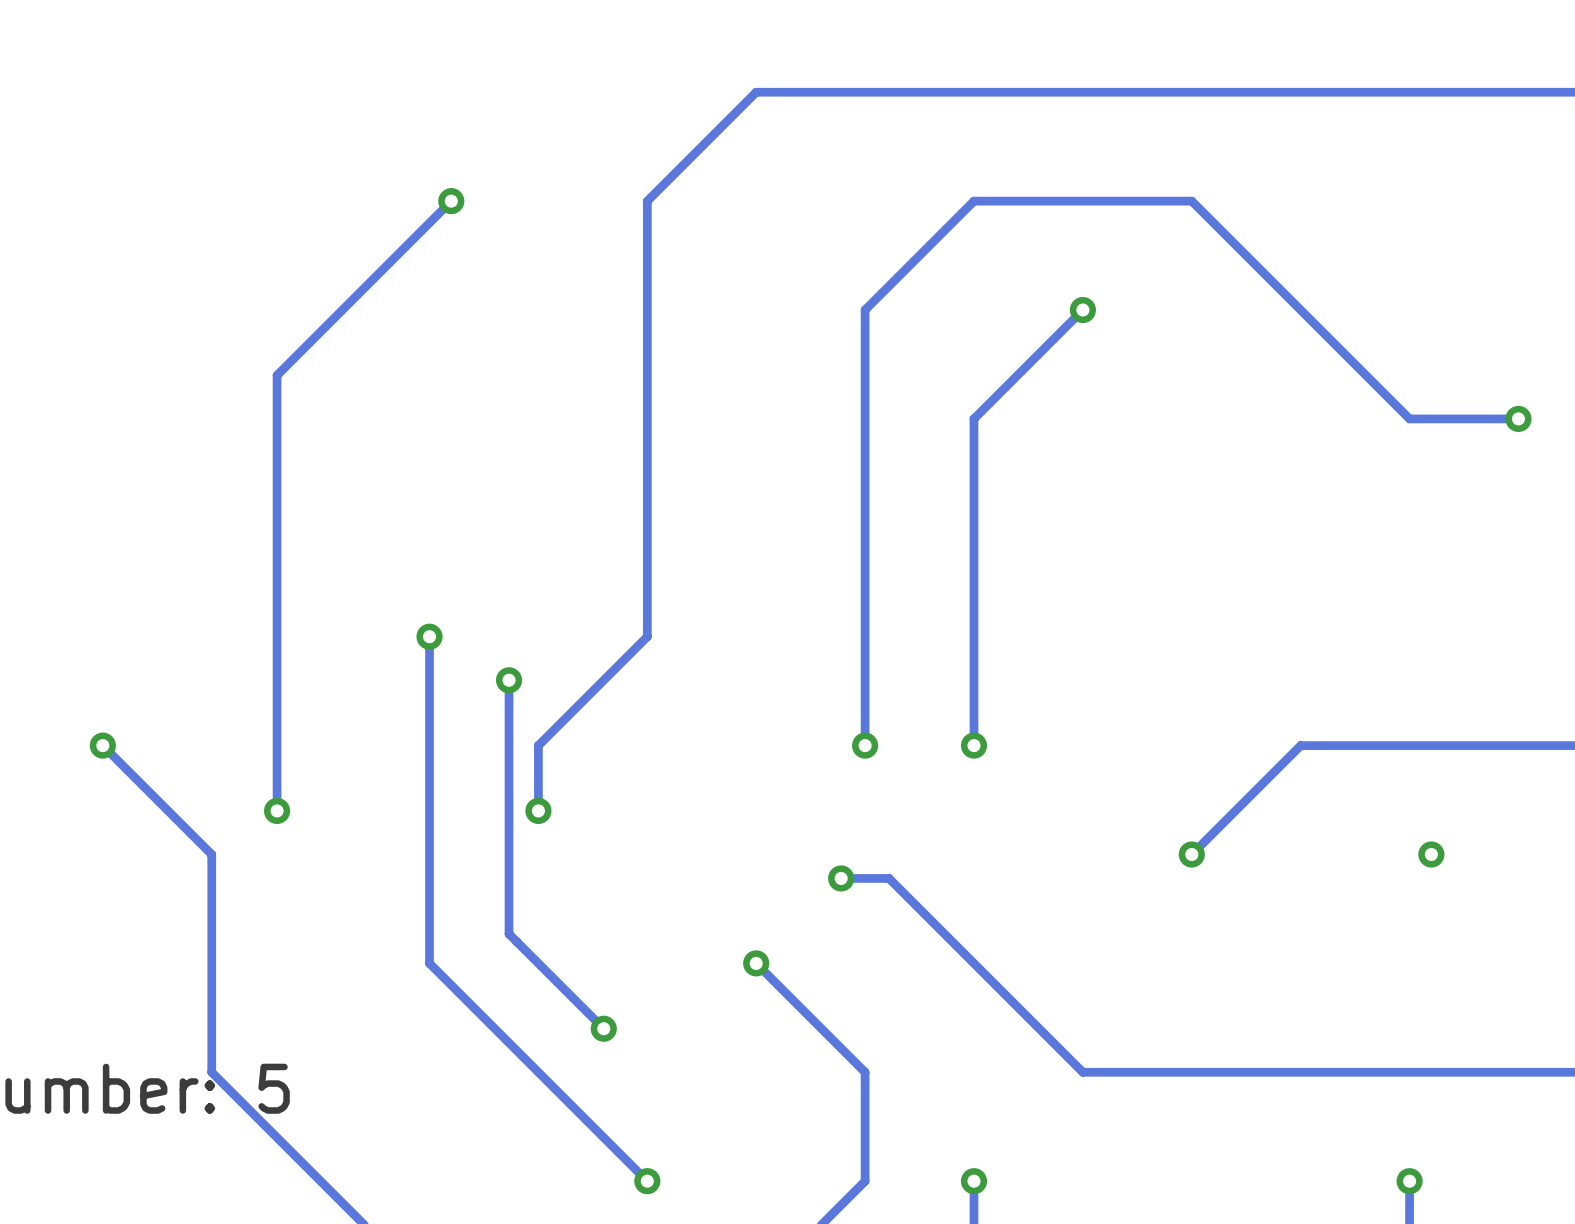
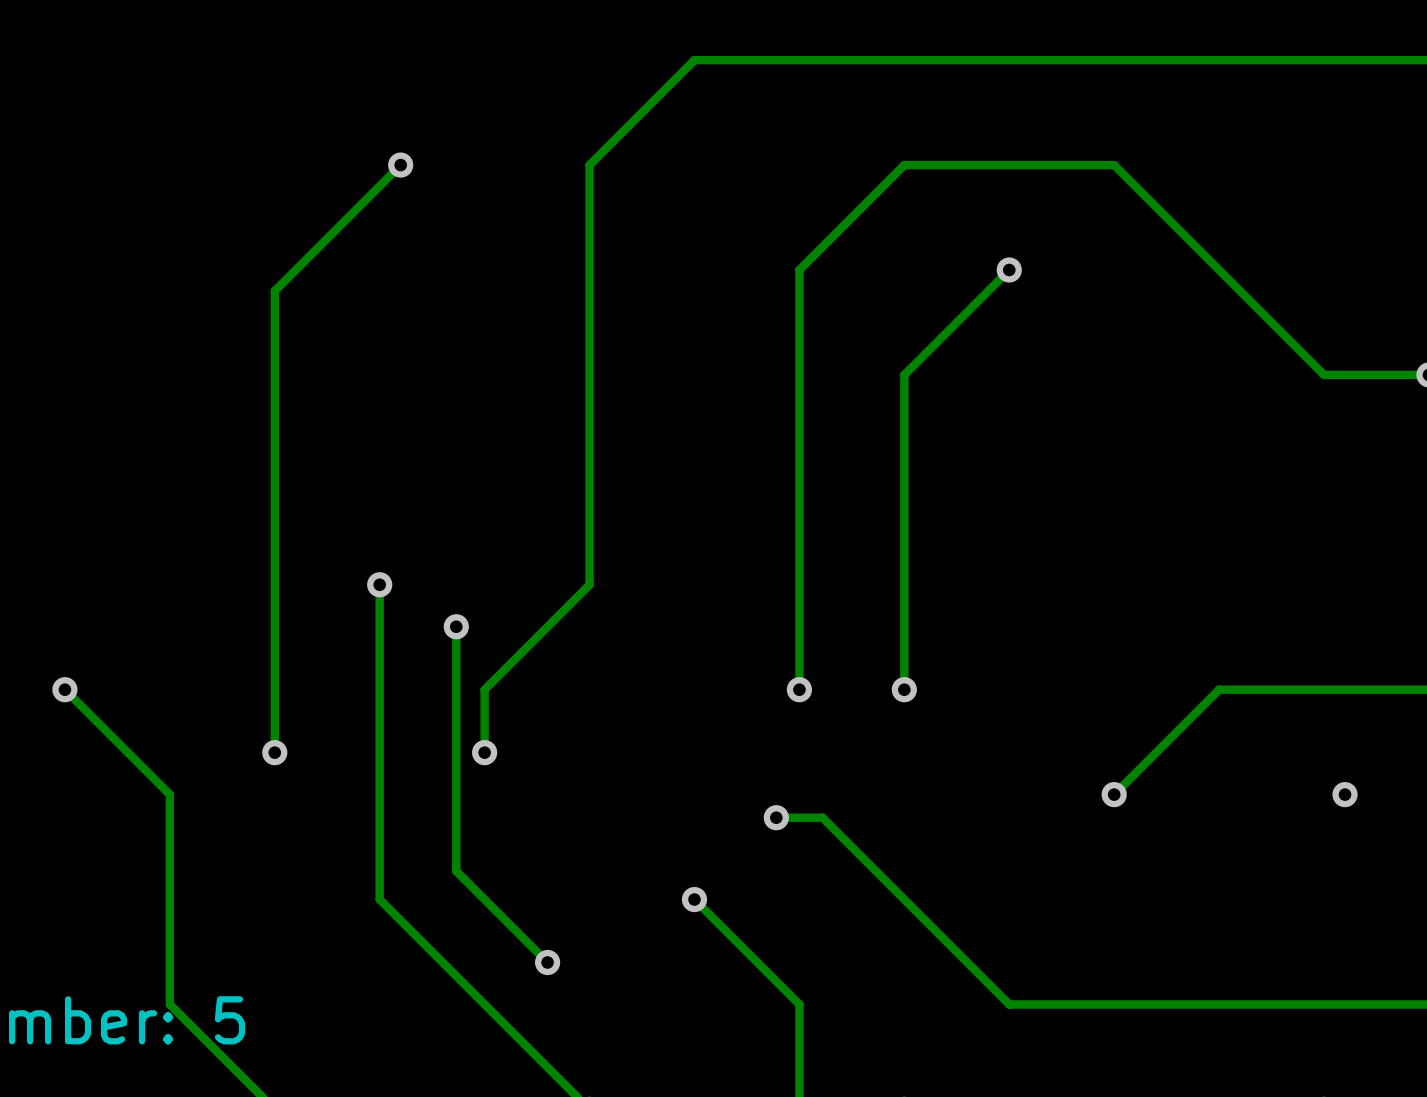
track: (320, 331) (277, 375) (277, 810) -> (274, 290) (274, 752)
via position: (277, 810) -> (274, 752)

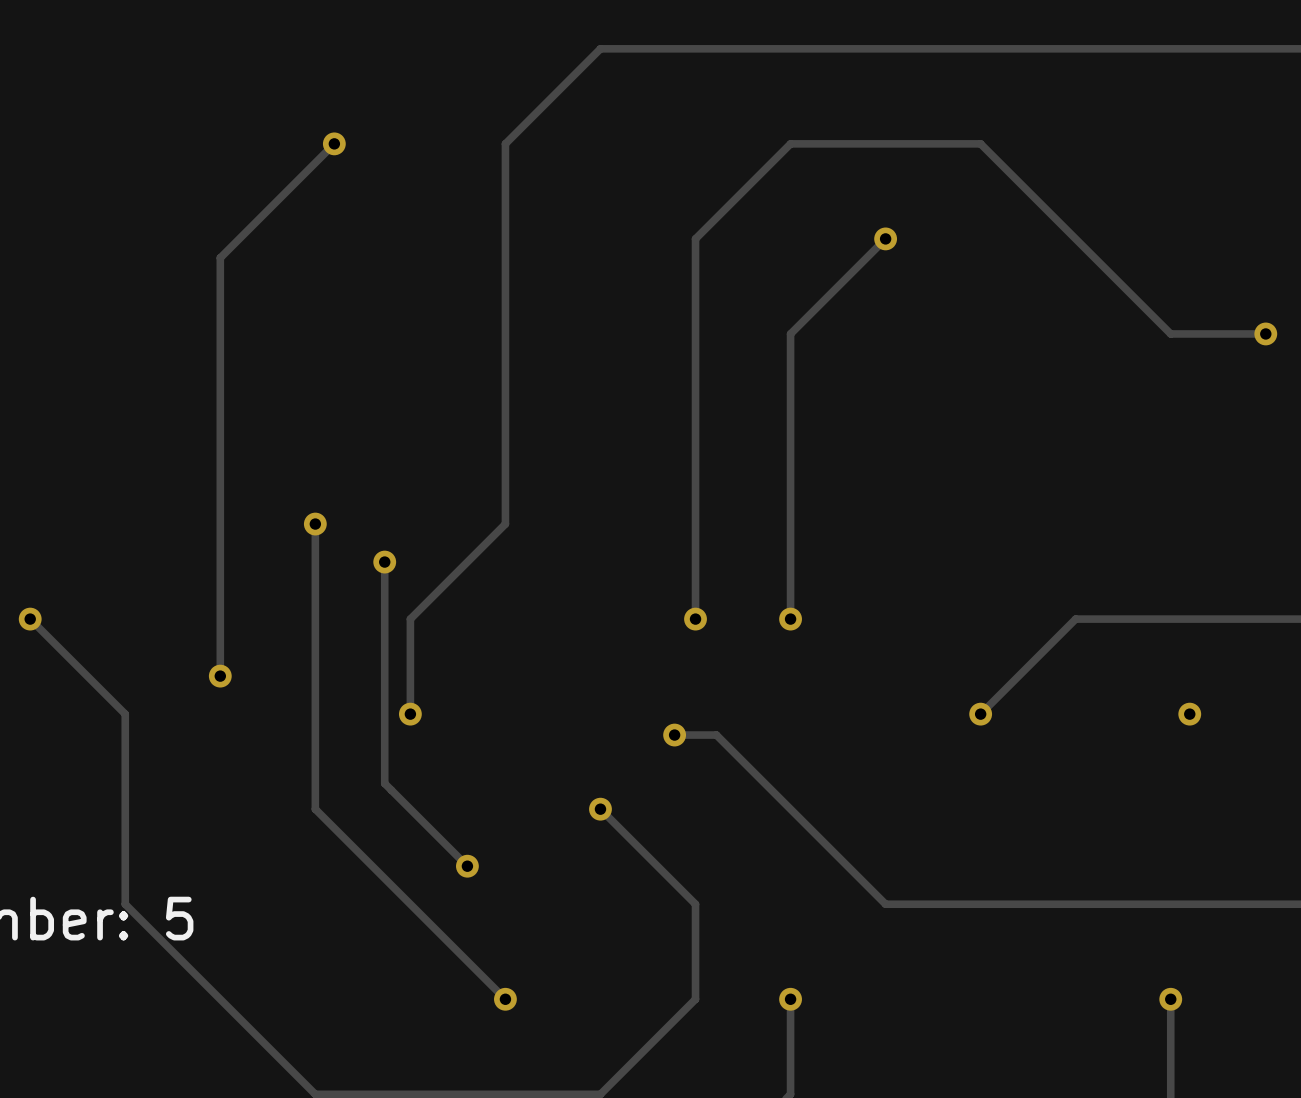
track: none -> (410, 676) (410, 714)
via position: (484, 752) -> (410, 714)

